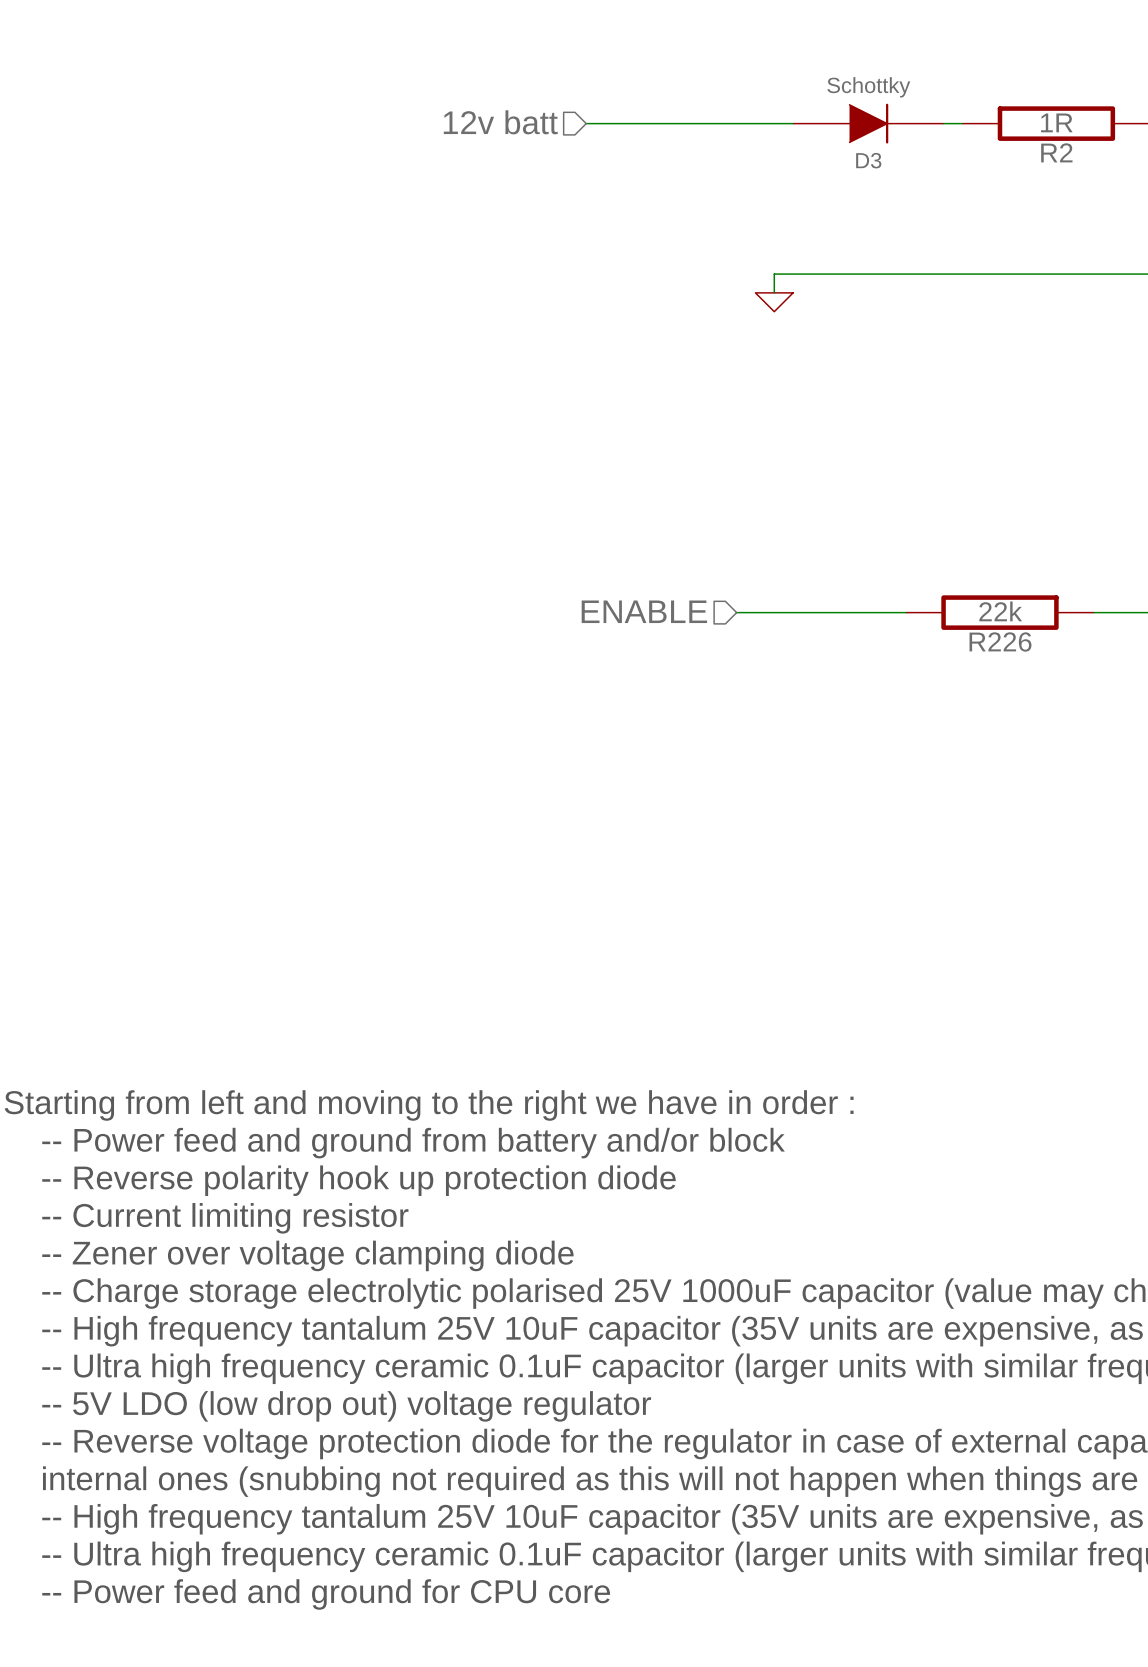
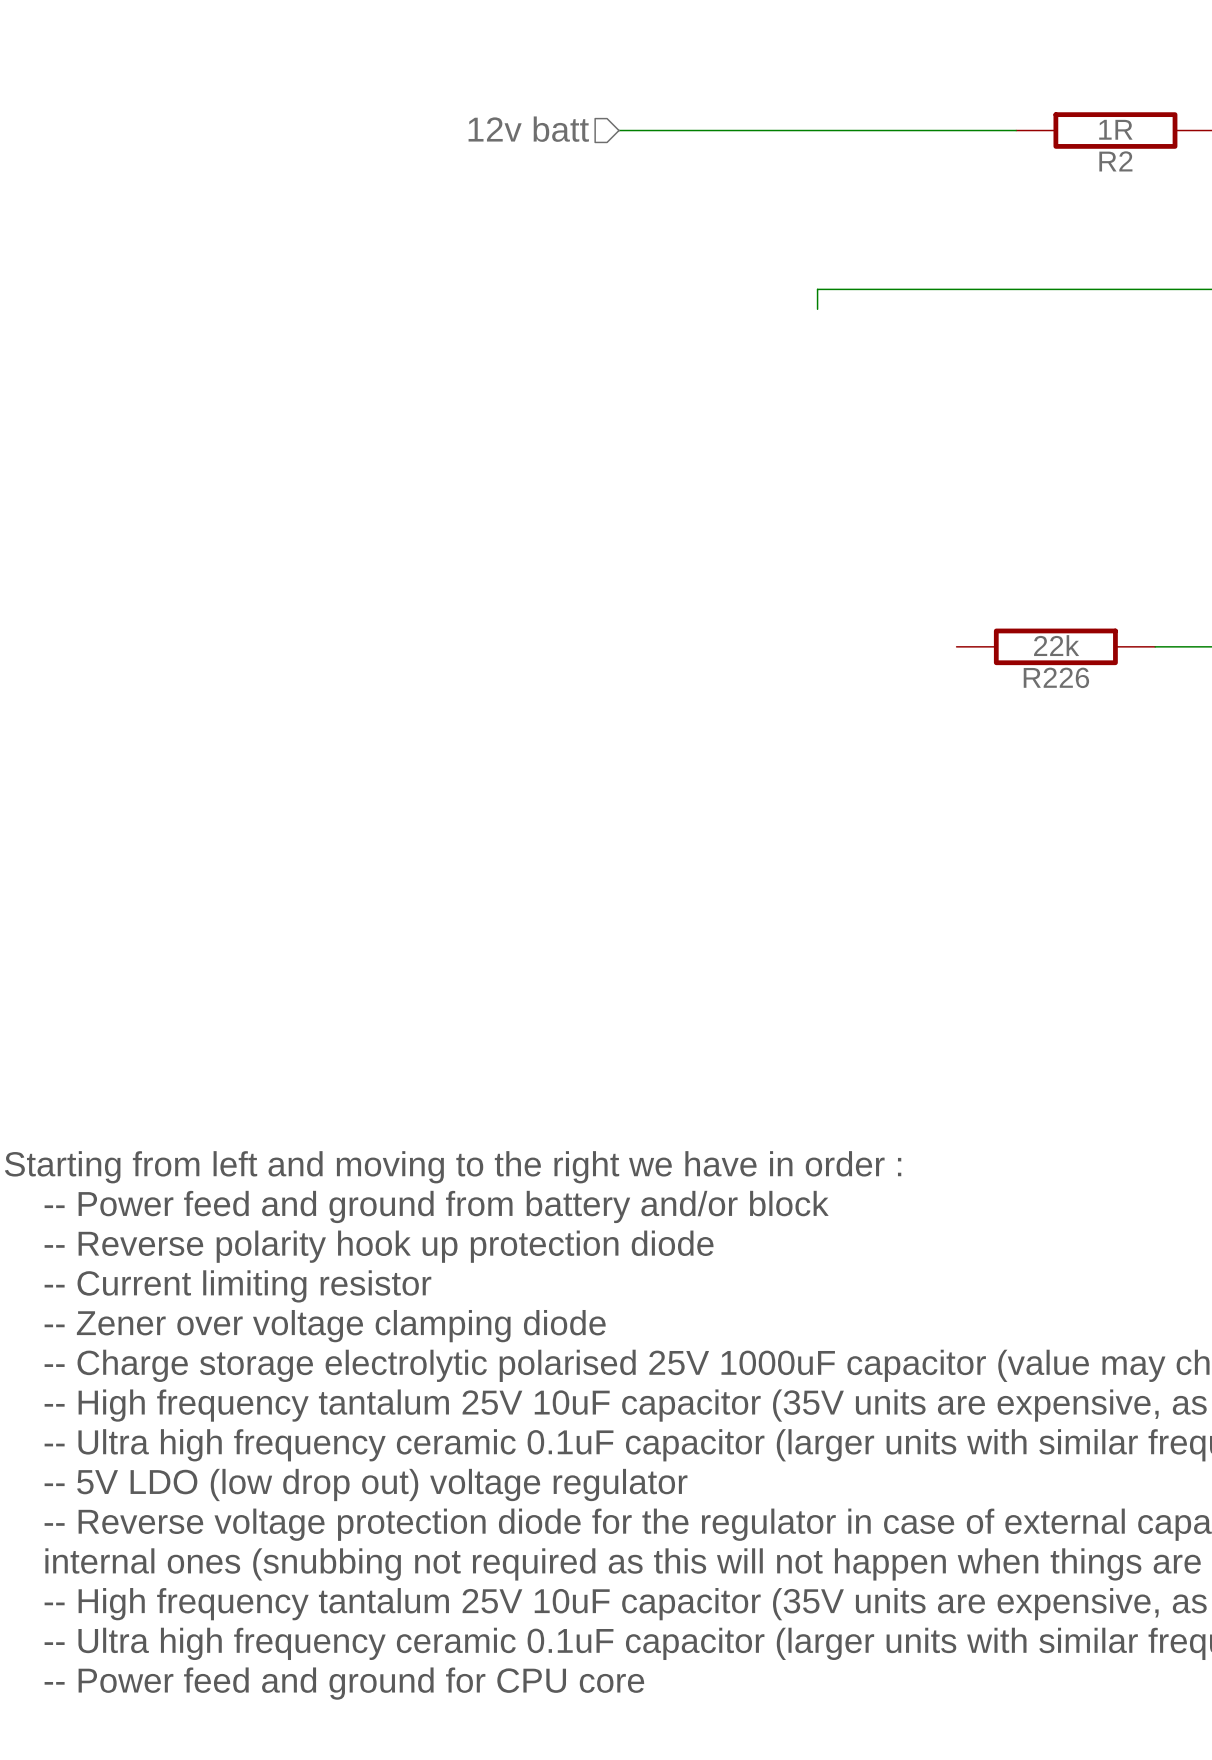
D3: Schottky (868, 123) -> none
power symbol: (774, 302) -> none
hierarchical label: ENABLE (644, 611) -> none
wire: (736, 612) (905, 612) -> none

